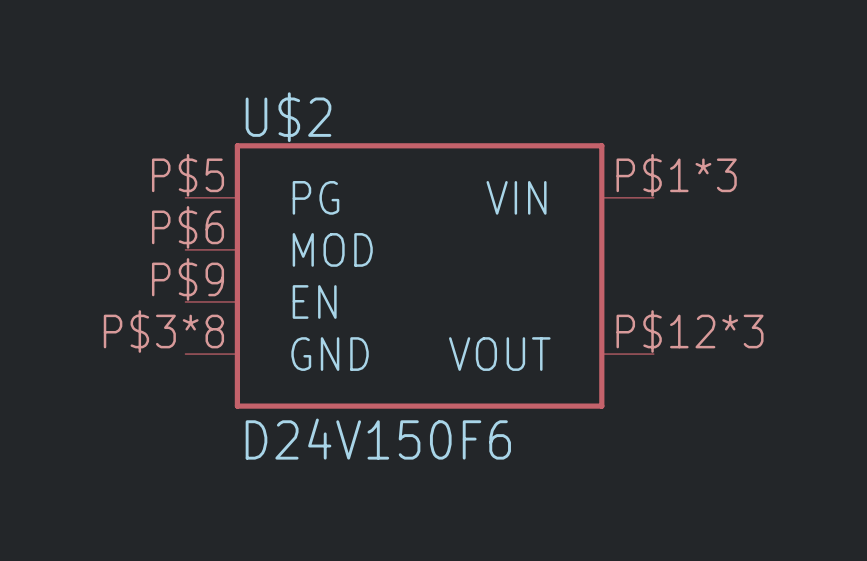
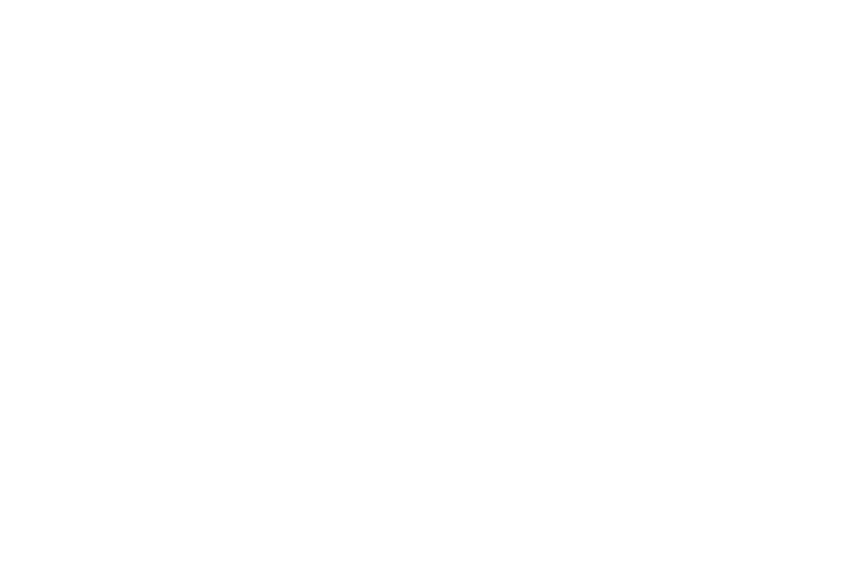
U$2: D24V150F6 (419, 275) -> none

